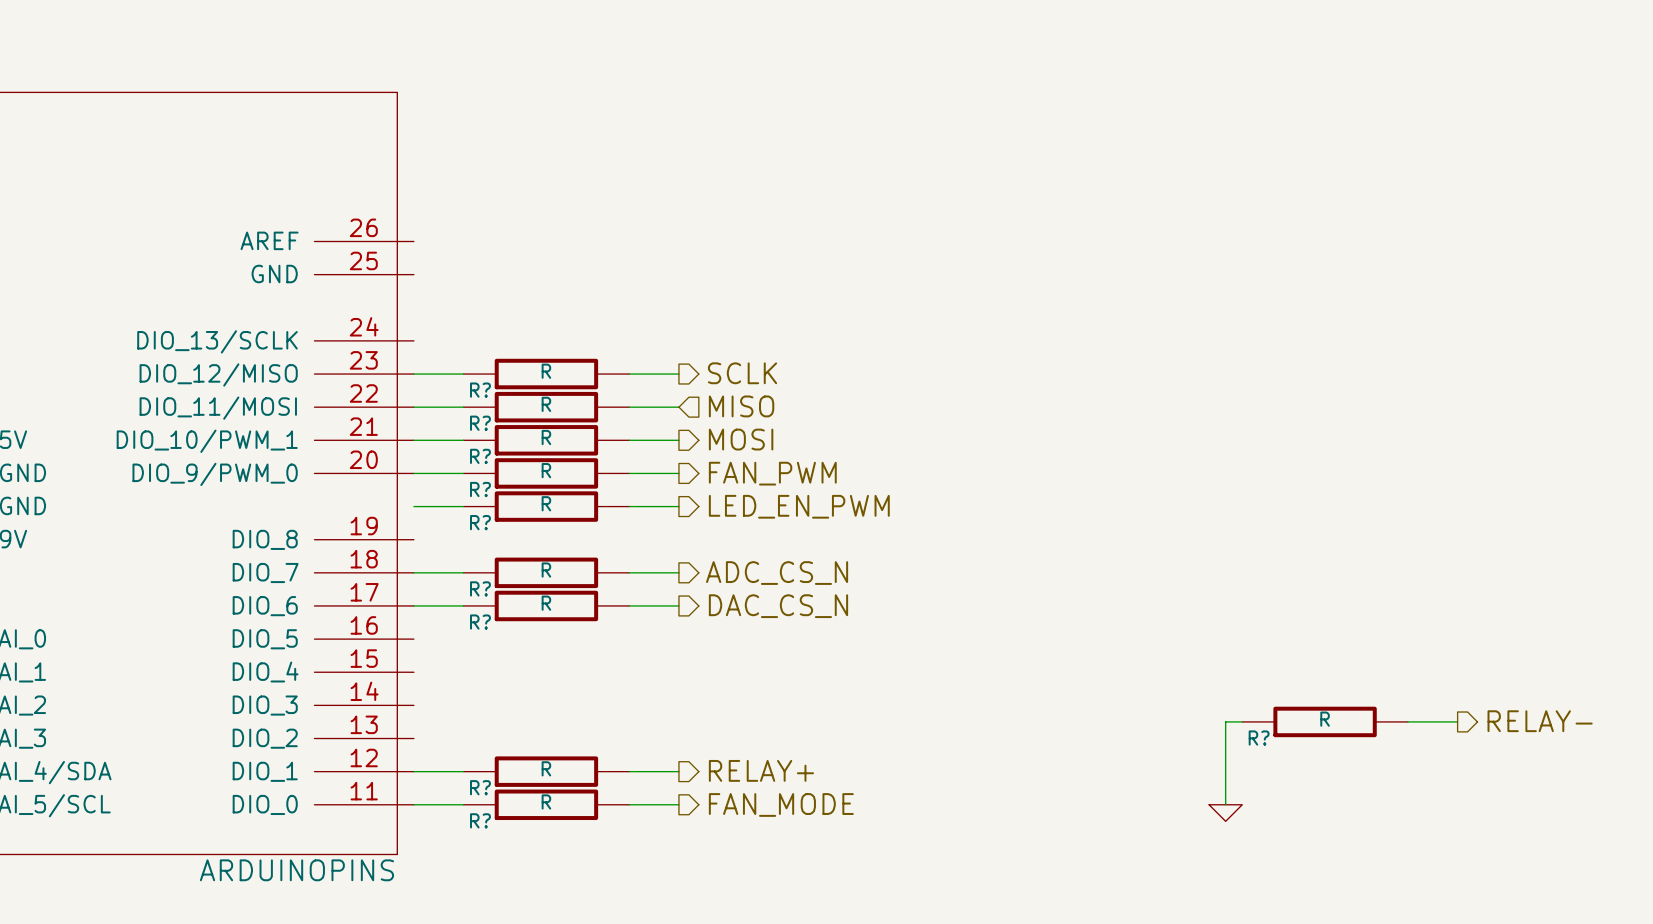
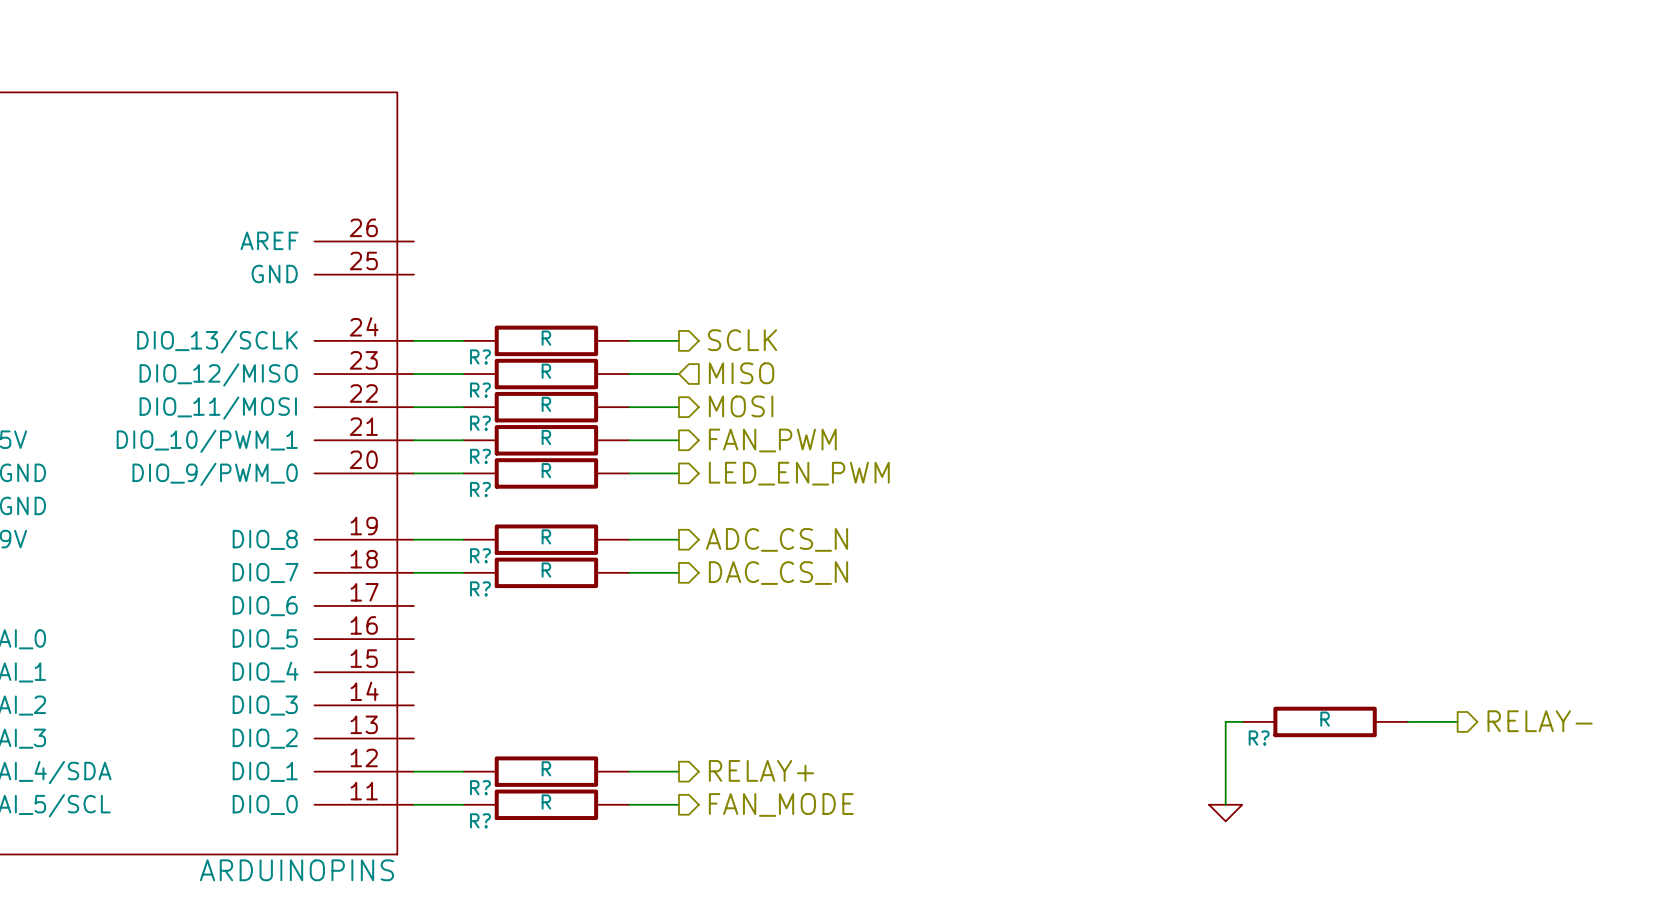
R?: none -> R (546, 340)
hierarchical label: none -> SCLK (742, 340)
hierarchical label shape: output (742, 373) -> input (741, 373)
hierarchical label: SCLK (742, 373) -> MISO (741, 373)
hierarchical label shape: input (741, 406) -> output (741, 406)
hierarchical label: MISO (741, 406) -> MOSI (741, 406)
hierarchical label: MOSI (741, 439) -> FAN_PWM (772, 440)
hierarchical label: FAN_PWM (772, 473) -> LED_EN_PWM (799, 473)
wire: (413, 506) (463, 506) -> (413, 539) (463, 539)
R?: R (546, 506) -> none
wire: (629, 506) (678, 506) -> (629, 539) (678, 539)
hierarchical label: LED_EN_PWM (799, 506) -> none
R?: none -> R (546, 539)
hierarchical label: none -> ADC_CS_N (777, 539)
hierarchical label: ADC_CS_N (777, 573) -> DAC_CS_N (778, 573)
wire: (413, 605) (463, 605) -> (413, 340) (463, 340)
R?: R (546, 605) -> none
wire: (629, 605) (678, 605) -> (629, 340) (678, 340)
hierarchical label: DAC_CS_N (778, 606) -> none

